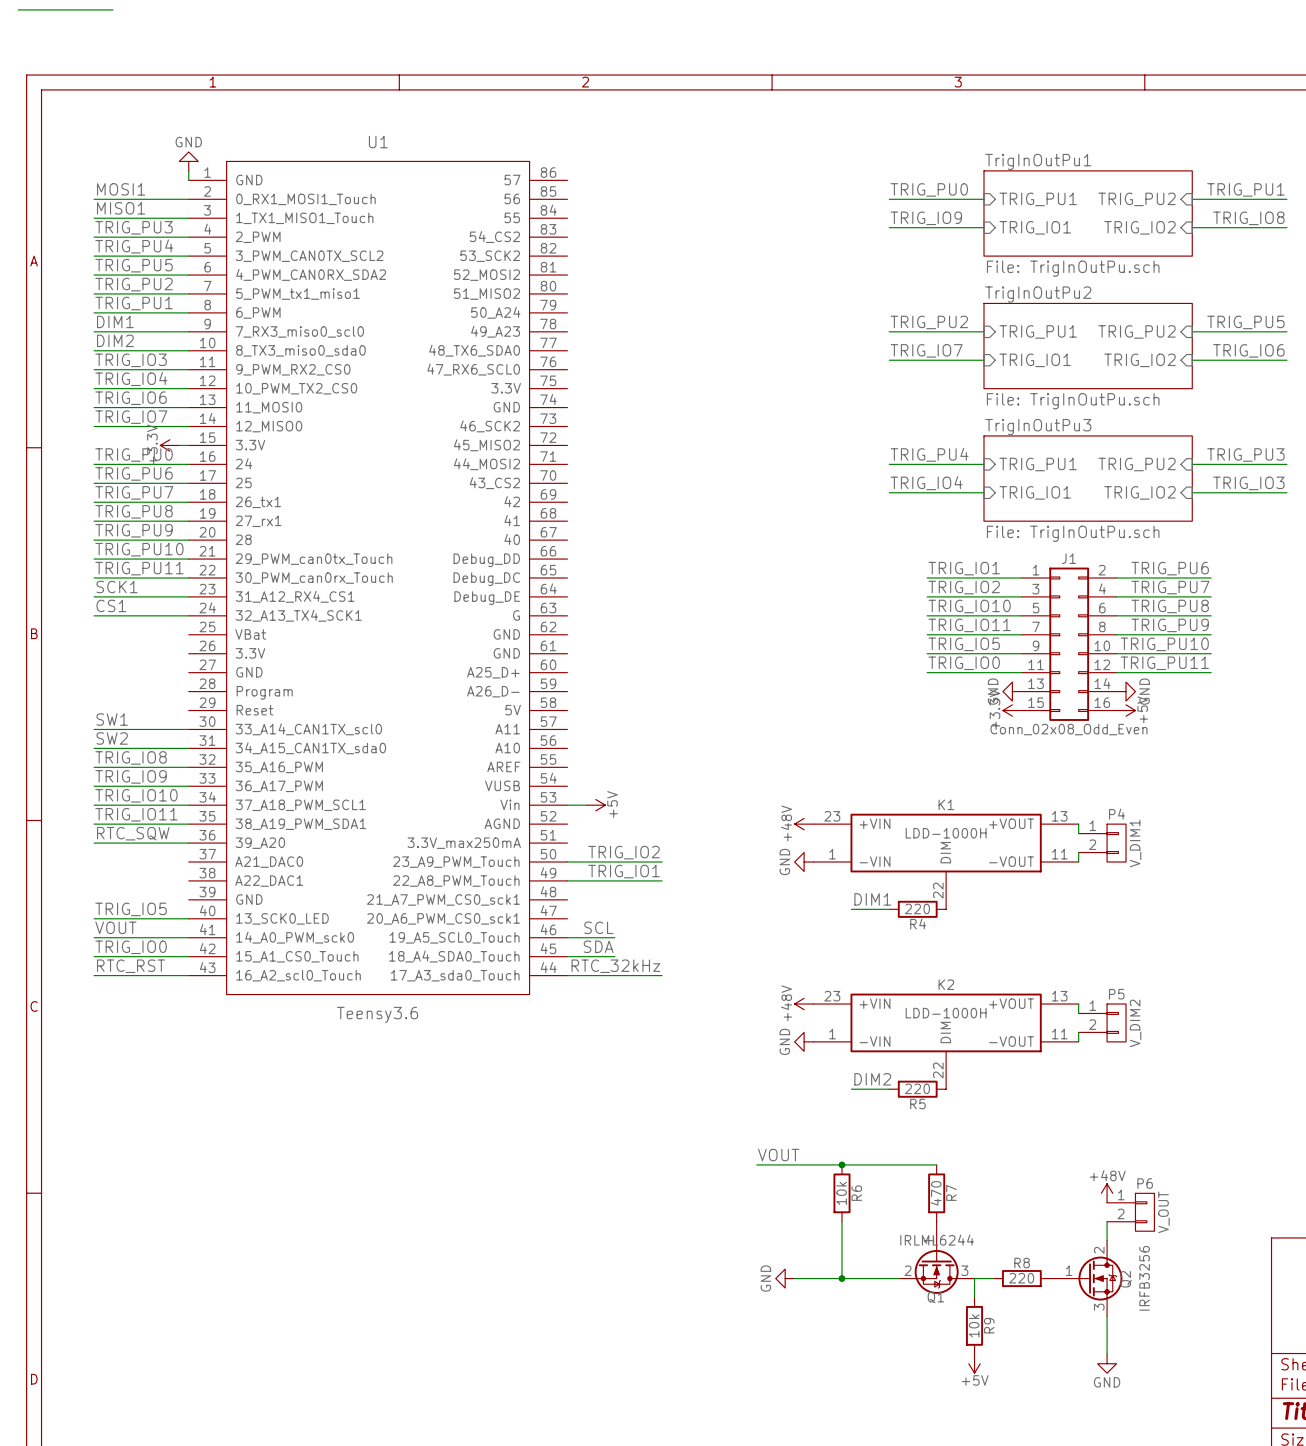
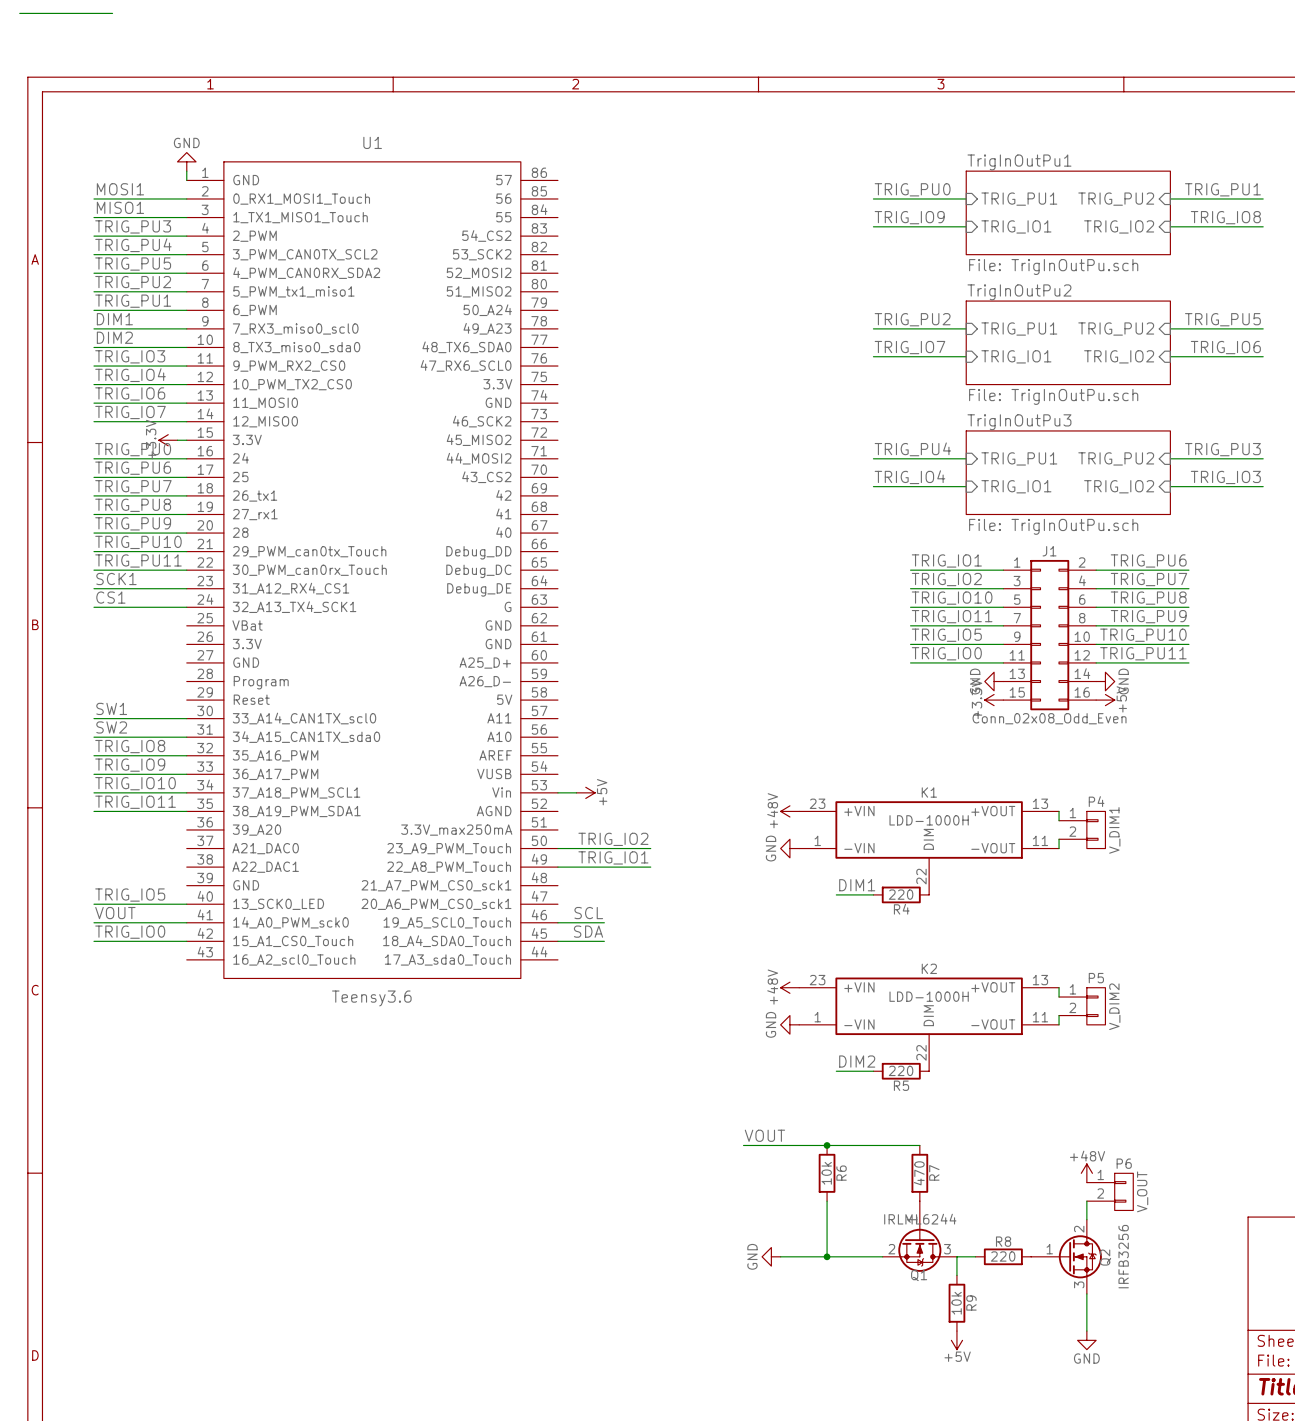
label: RTC_SQW (133, 833) -> none
wire: (94, 843) (188, 843) -> none
label: RTC_RST (131, 966) -> none
label: RTC_32kHz (615, 966) -> none
wire: (94, 975) (188, 975) -> none
wire: (567, 975) (662, 975) -> none

